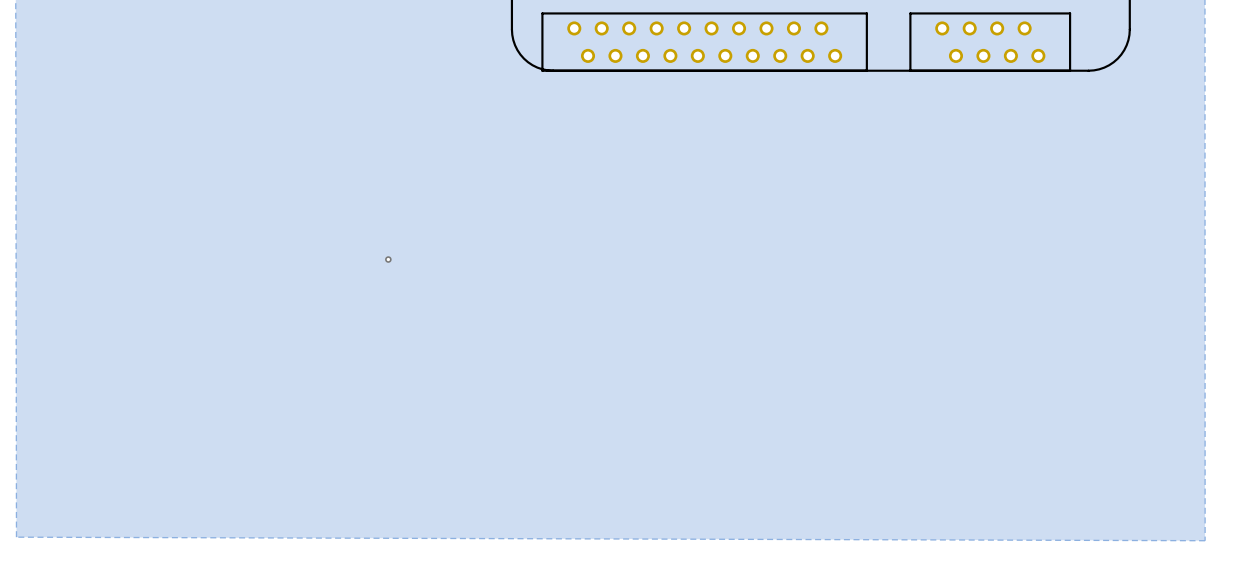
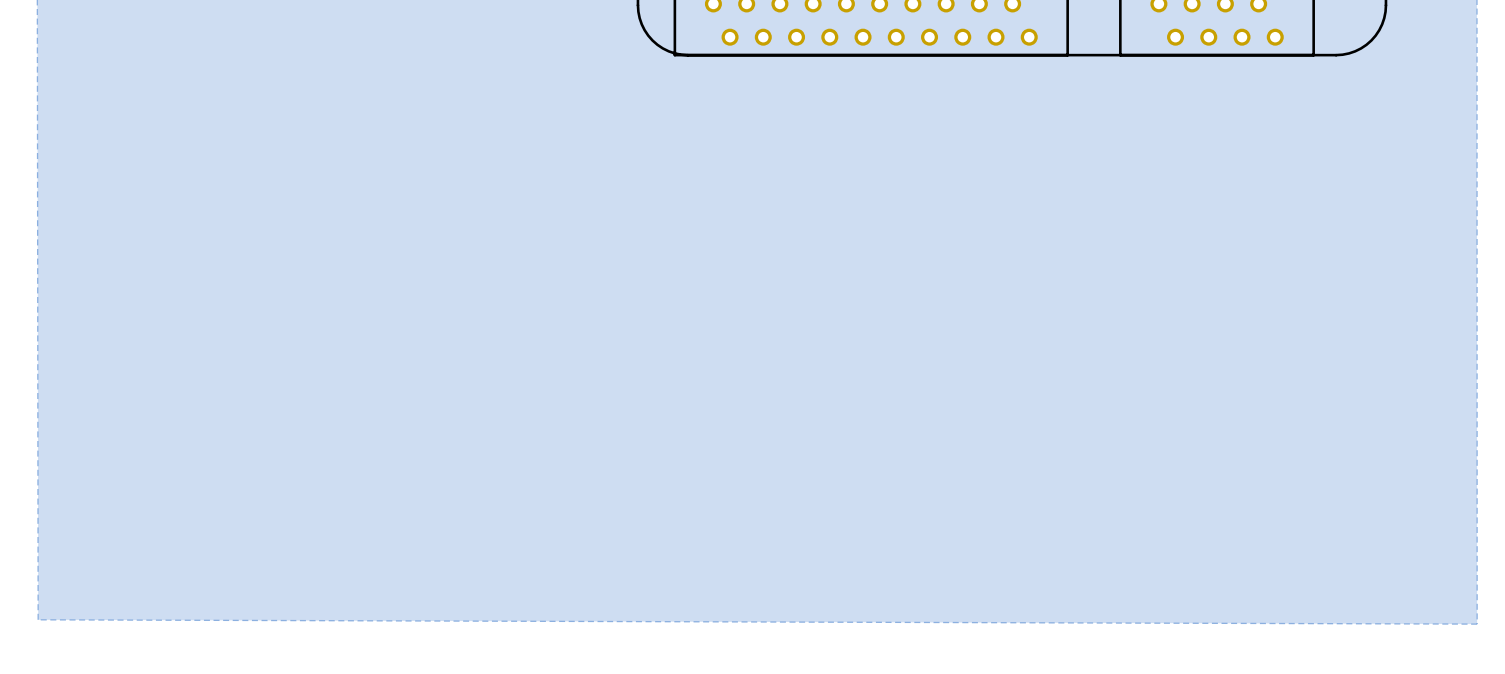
via: (388, 259) -> none

